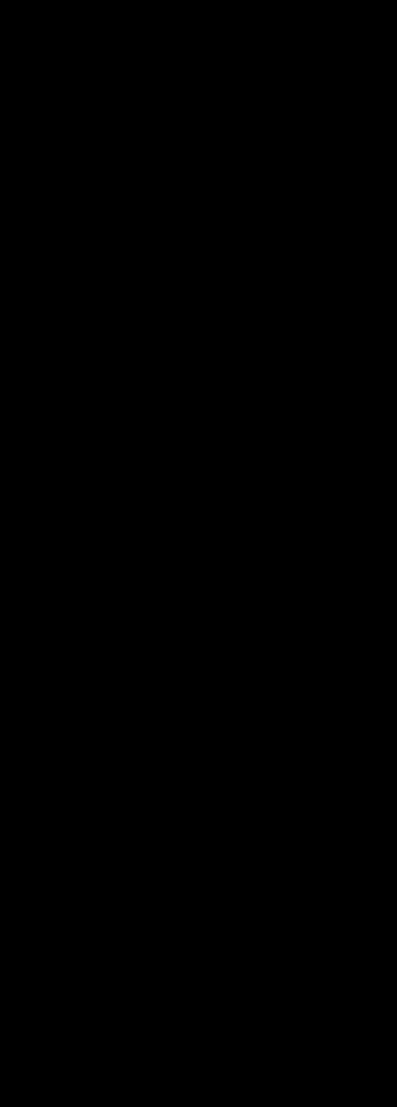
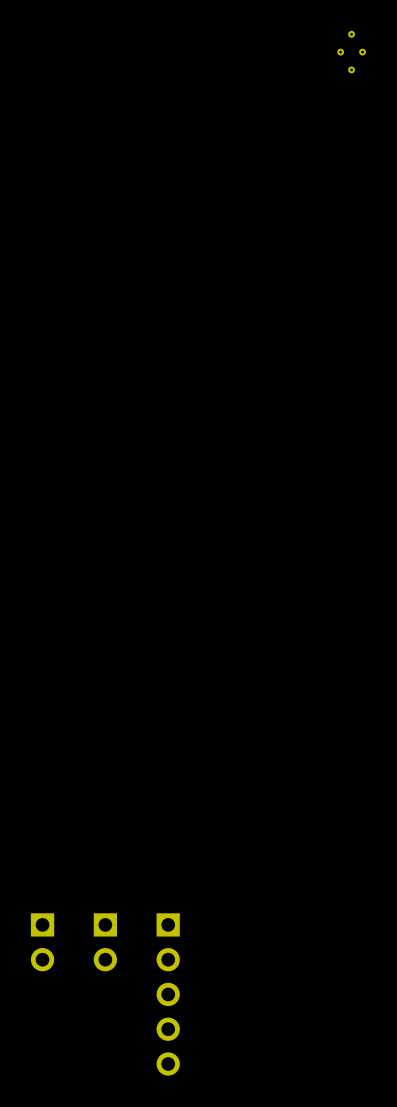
part: none -> (351, 52)
part: none -> (42, 942)
part: none -> (105, 942)
part: none -> (168, 994)

